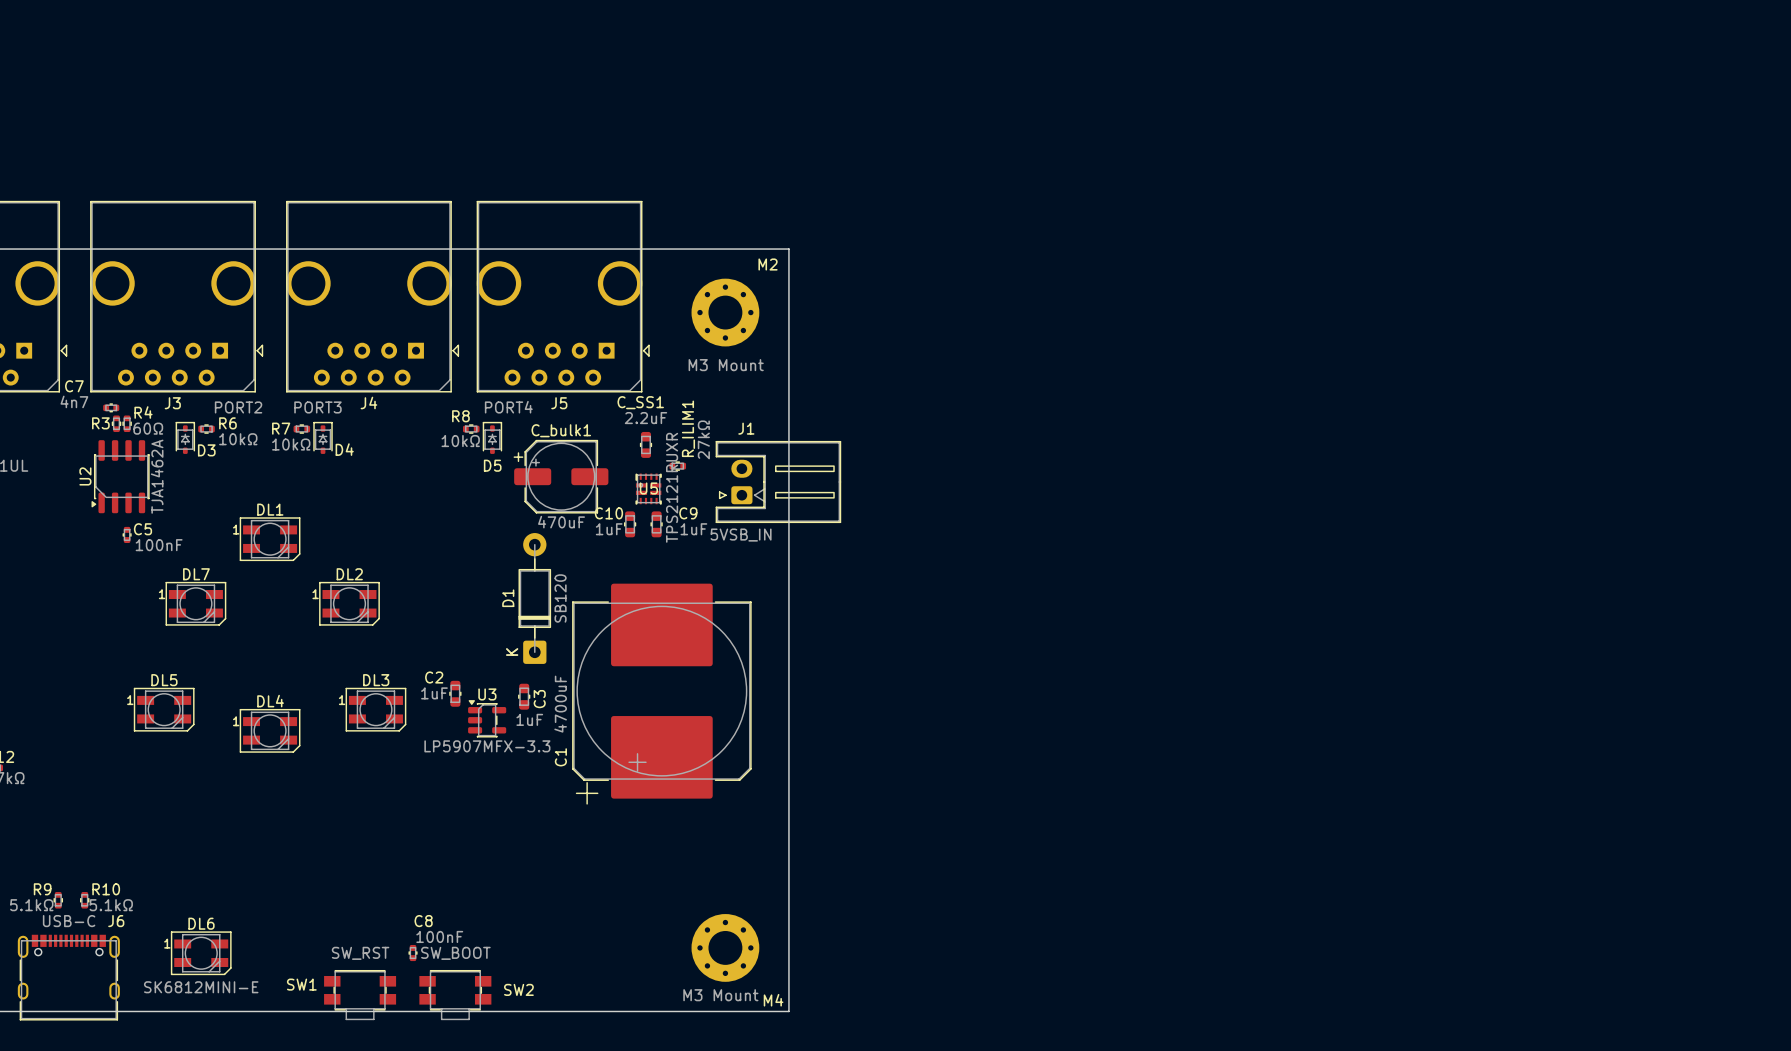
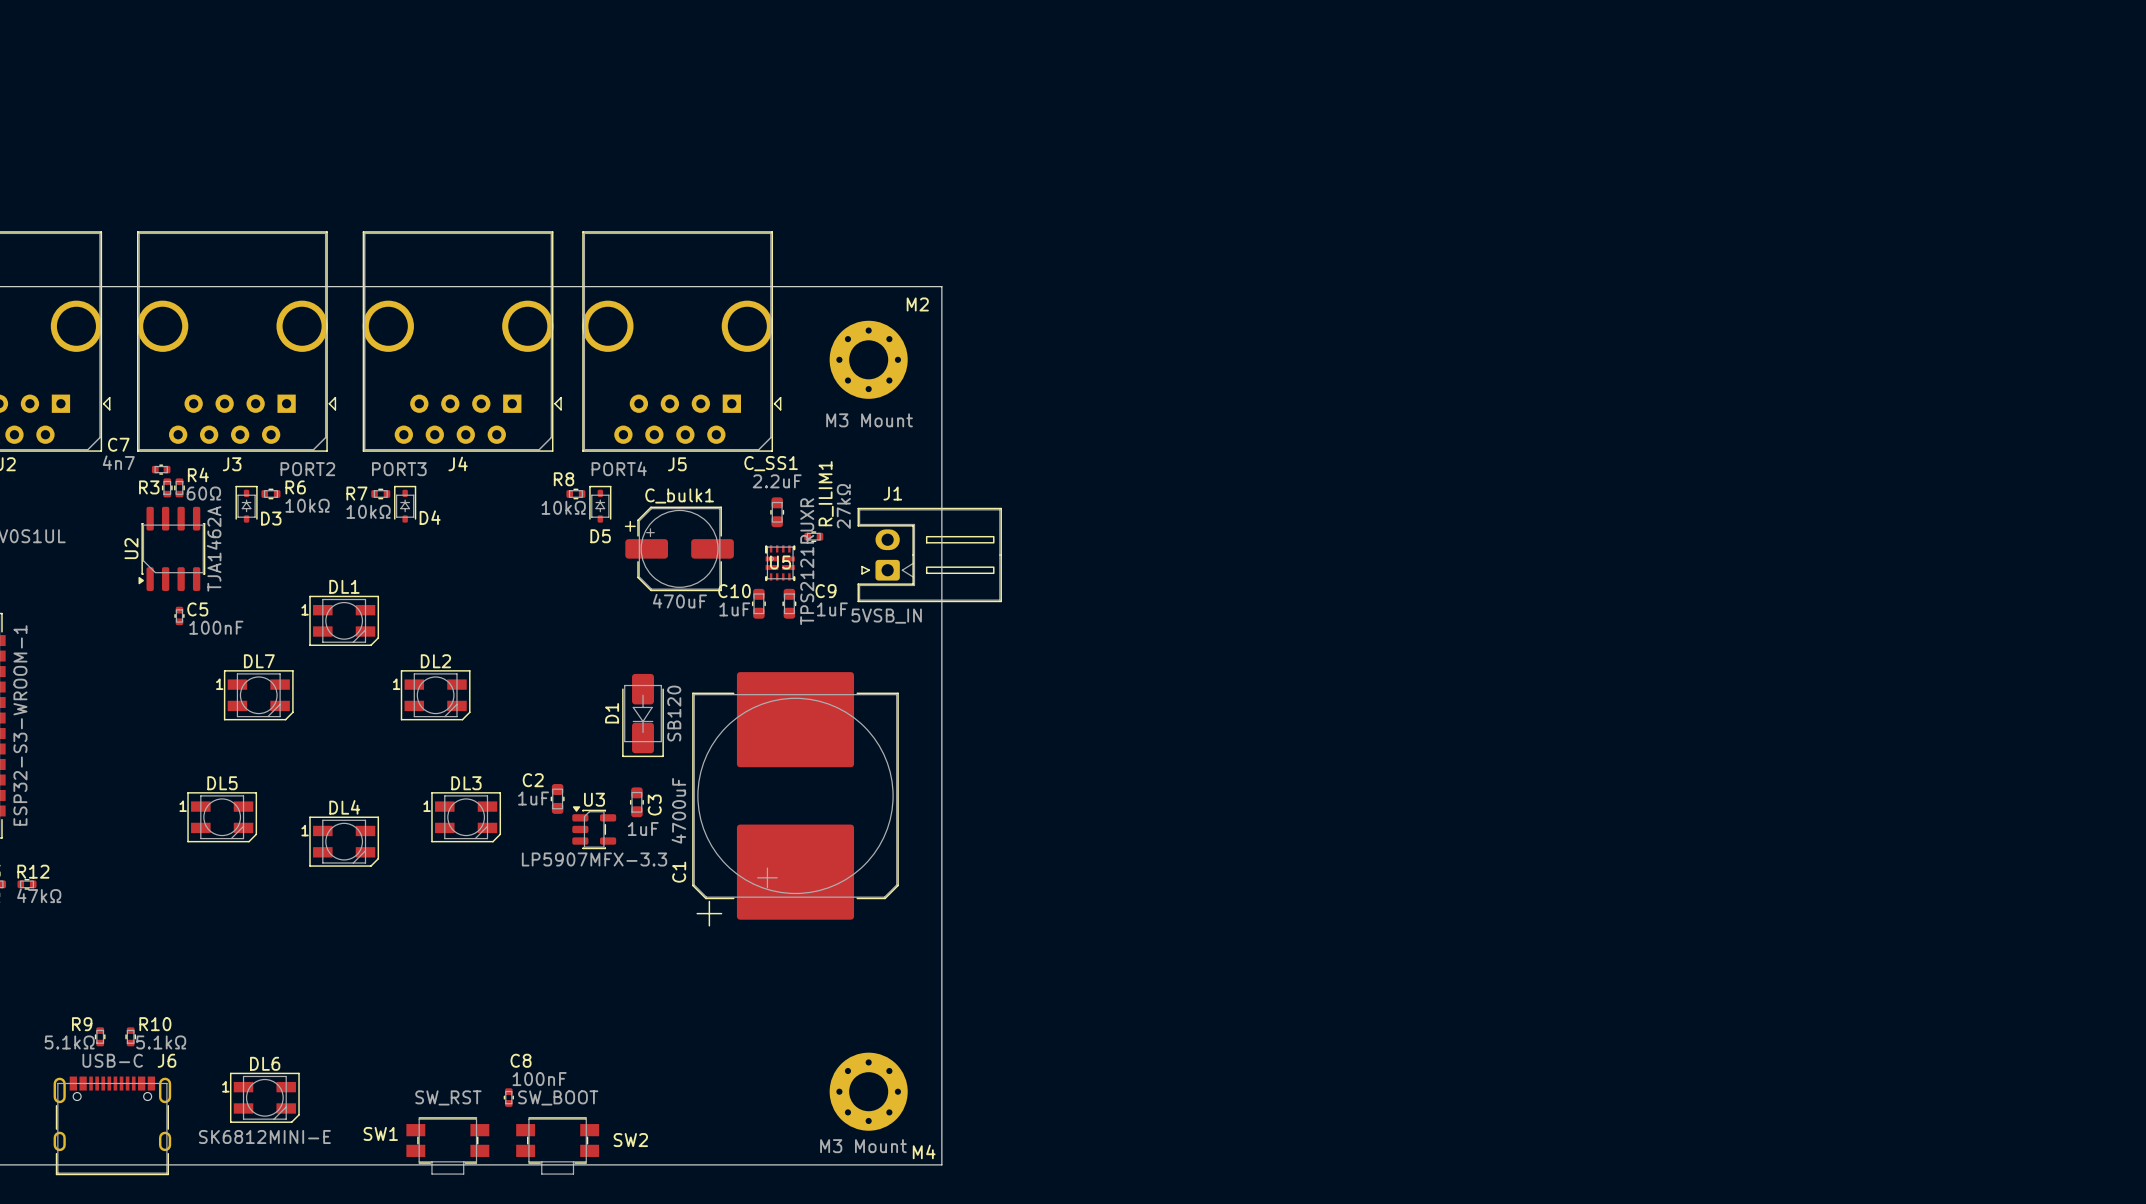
D1 footprint: [518, 533, 552, 664] -> [622, 673, 664, 758]

